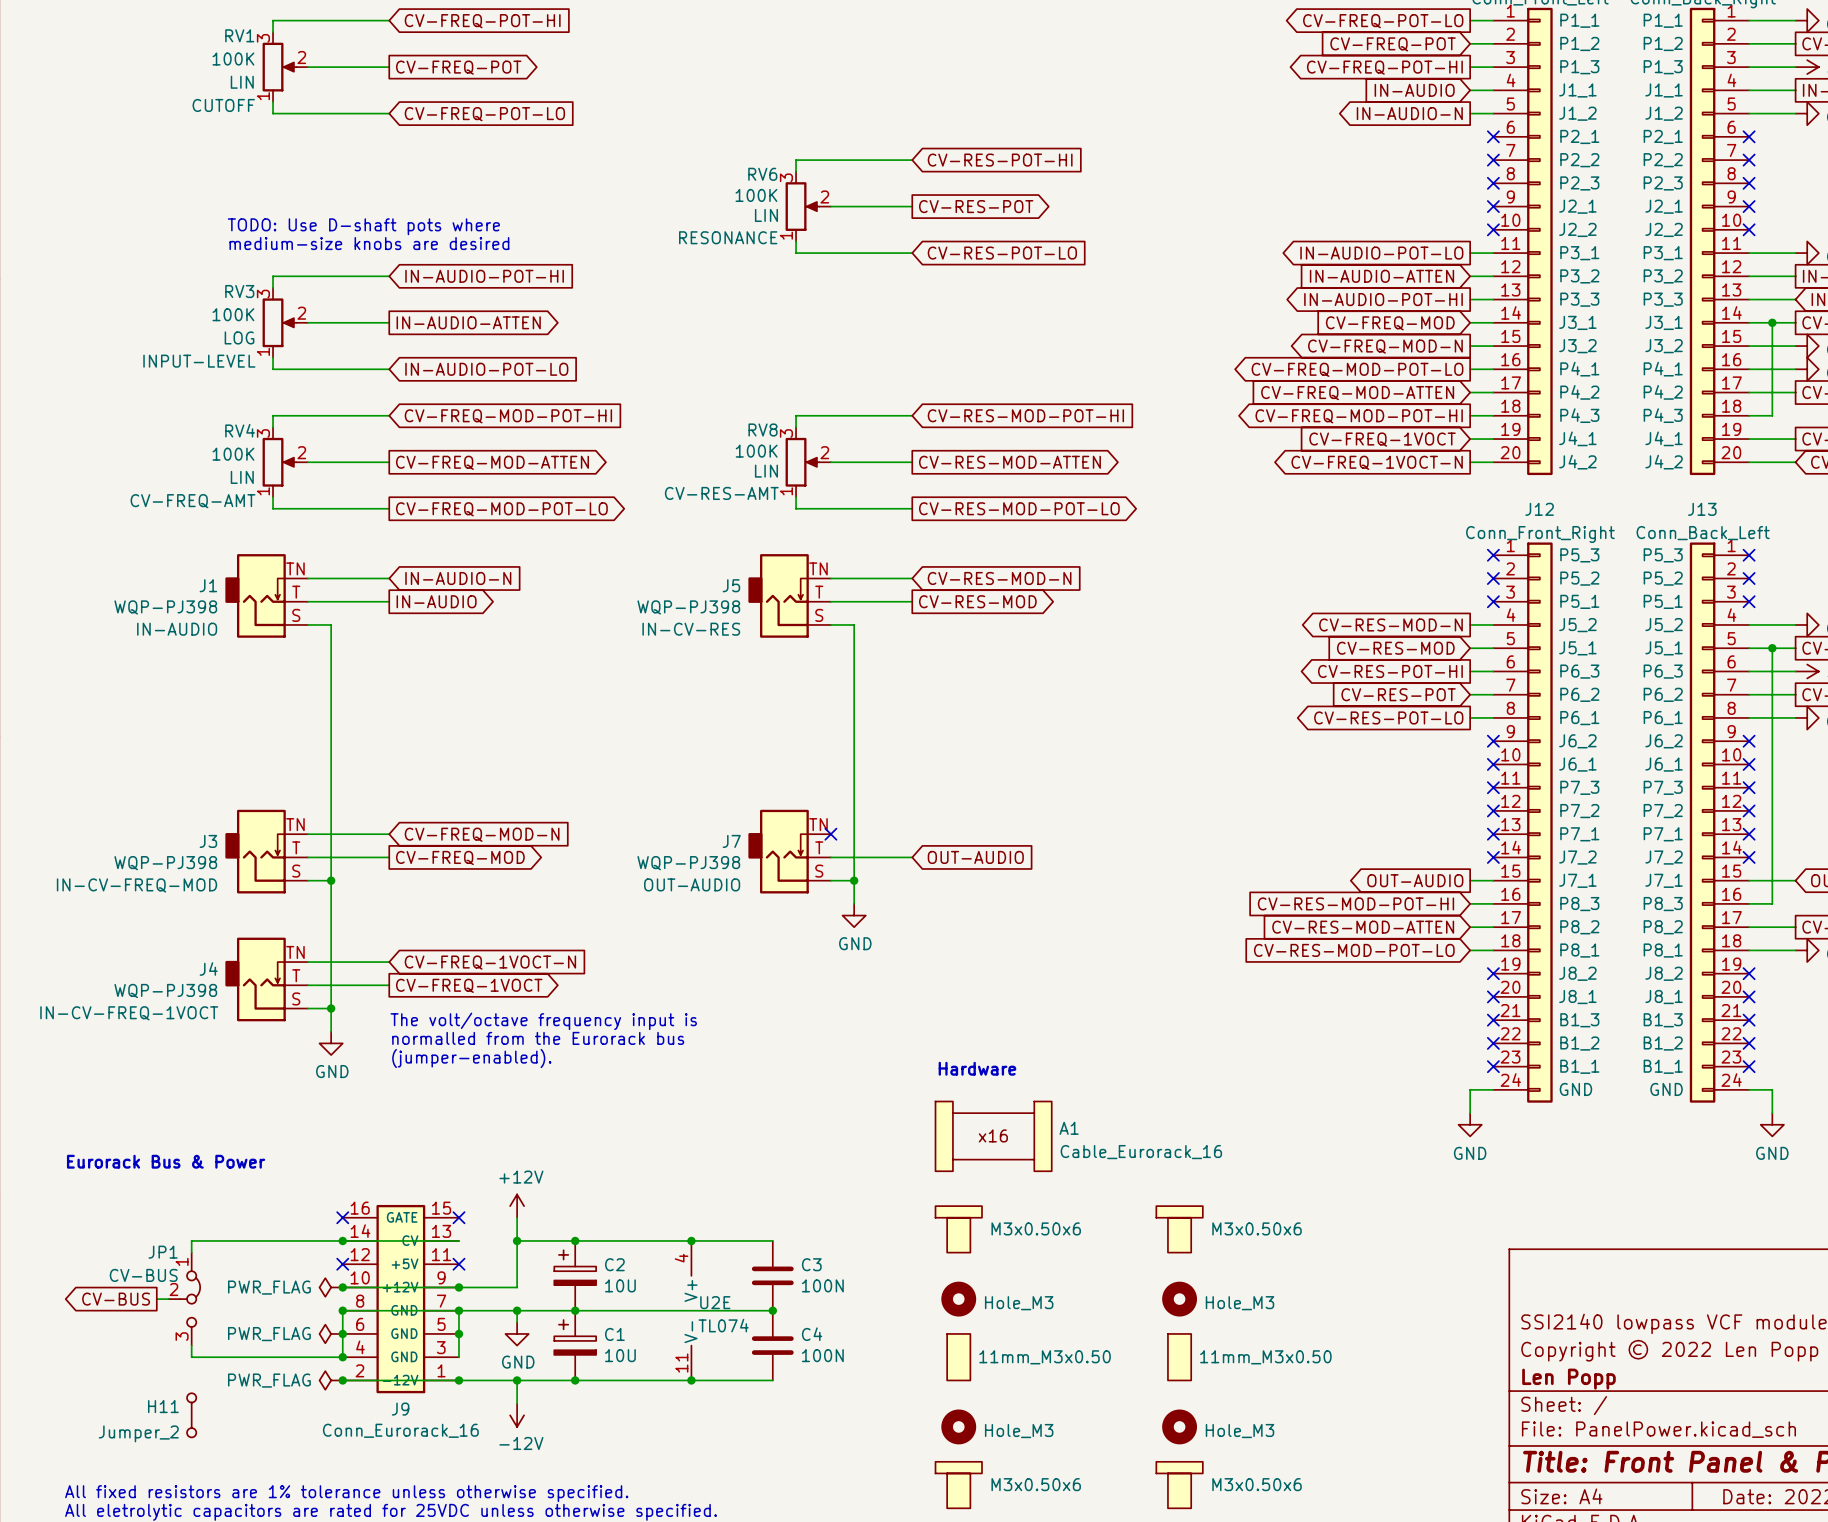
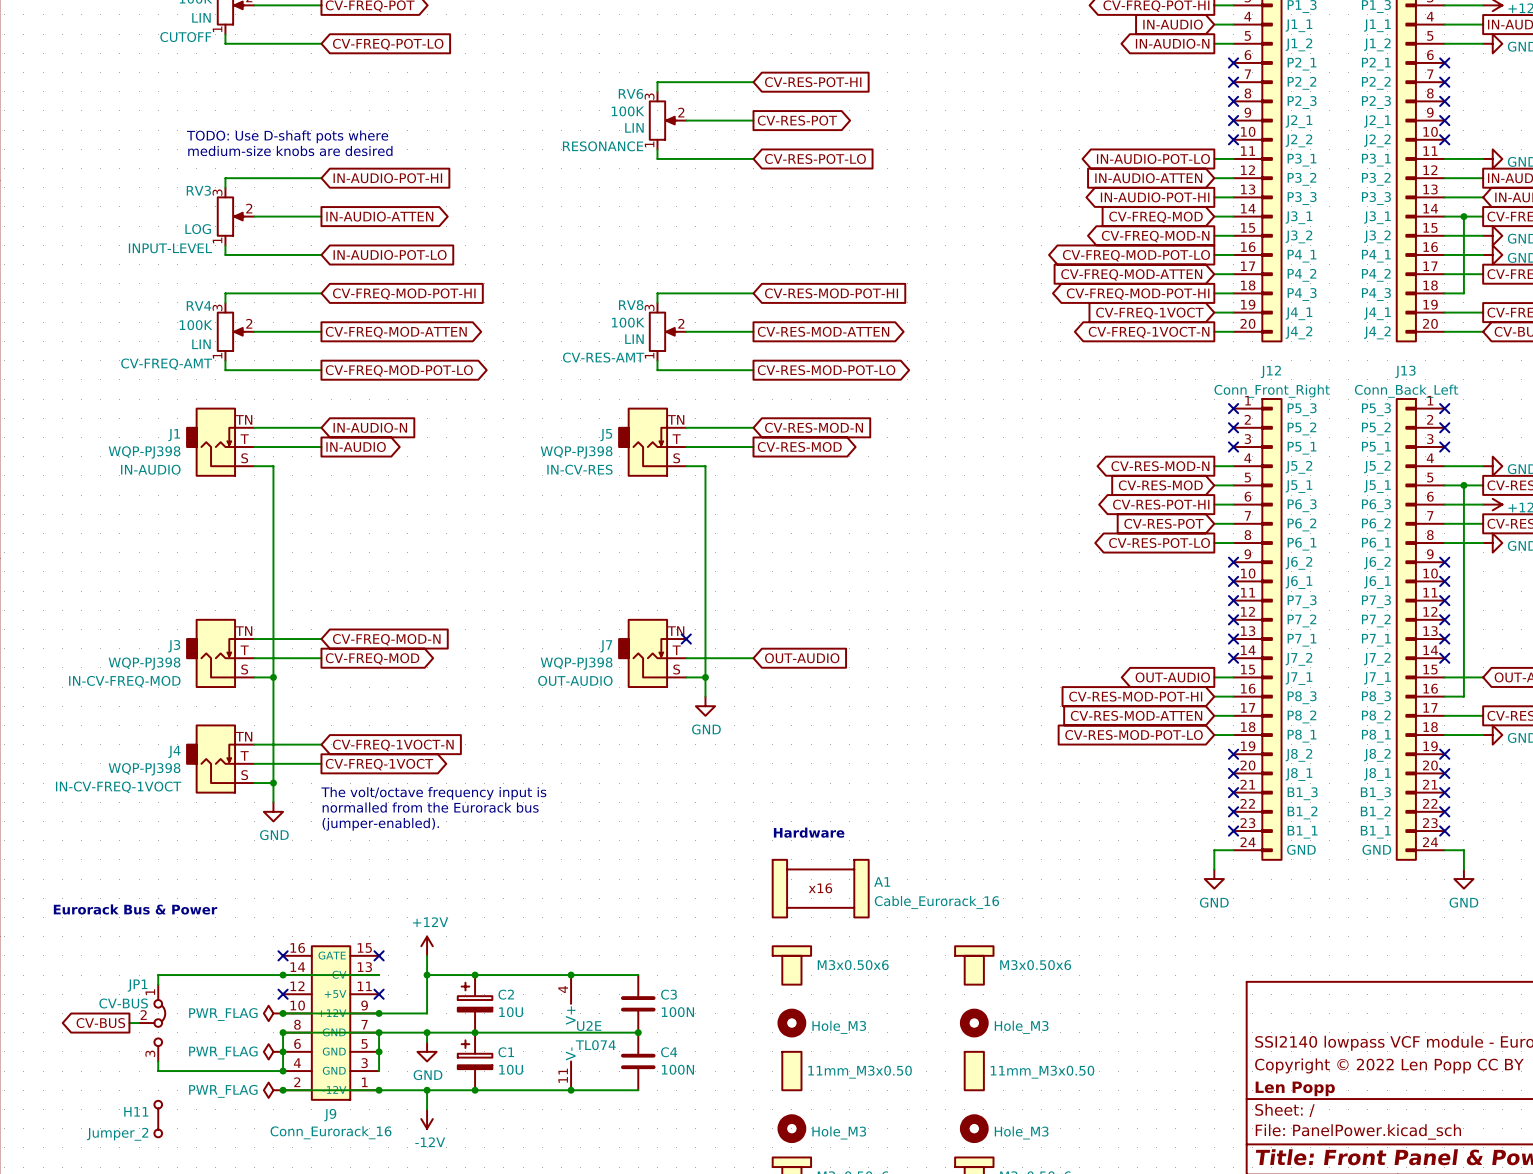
RV3 value: 100K (233, 314) -> none

